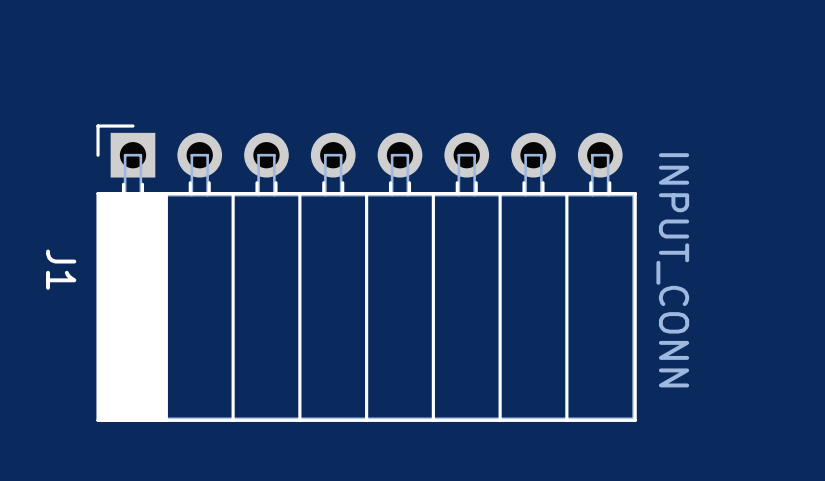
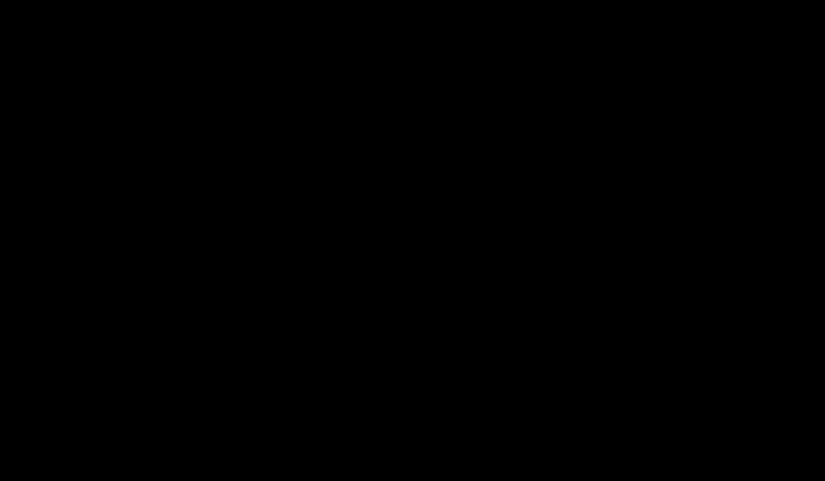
J1: INPUT_CONN (366, 273) -> none

